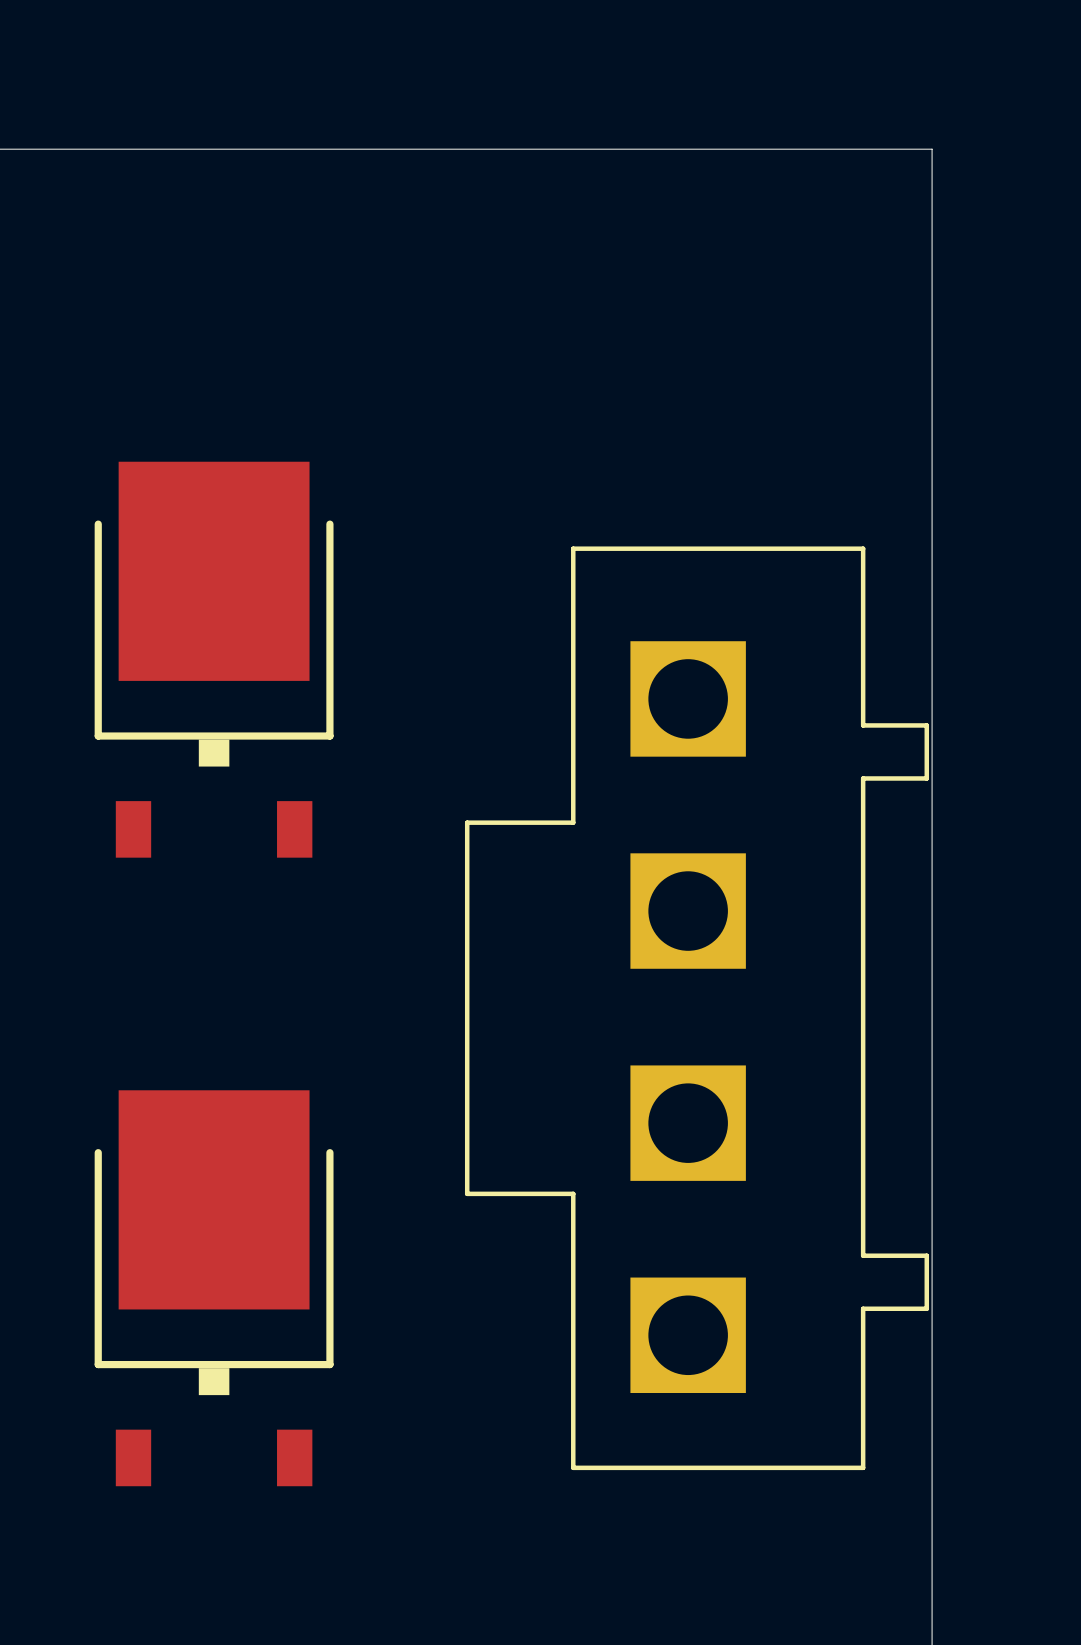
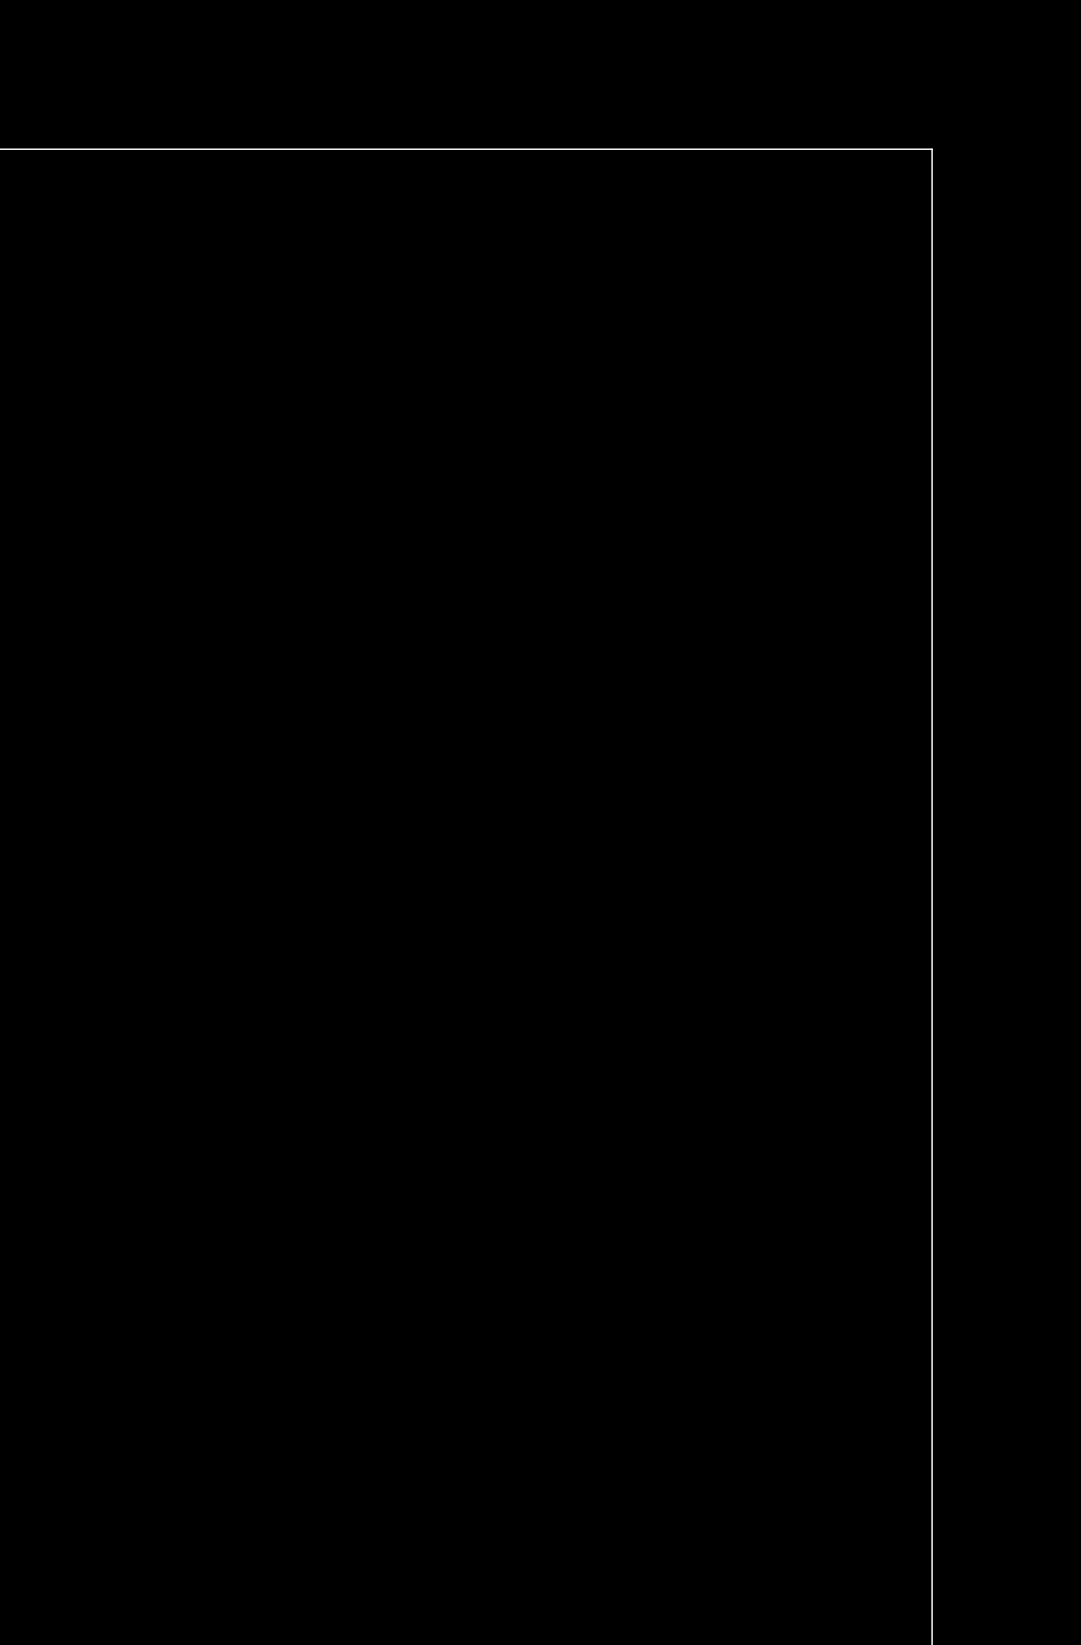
part: (214, 659) -> none
part: (696, 1008) -> none
part: (214, 1288) -> none

